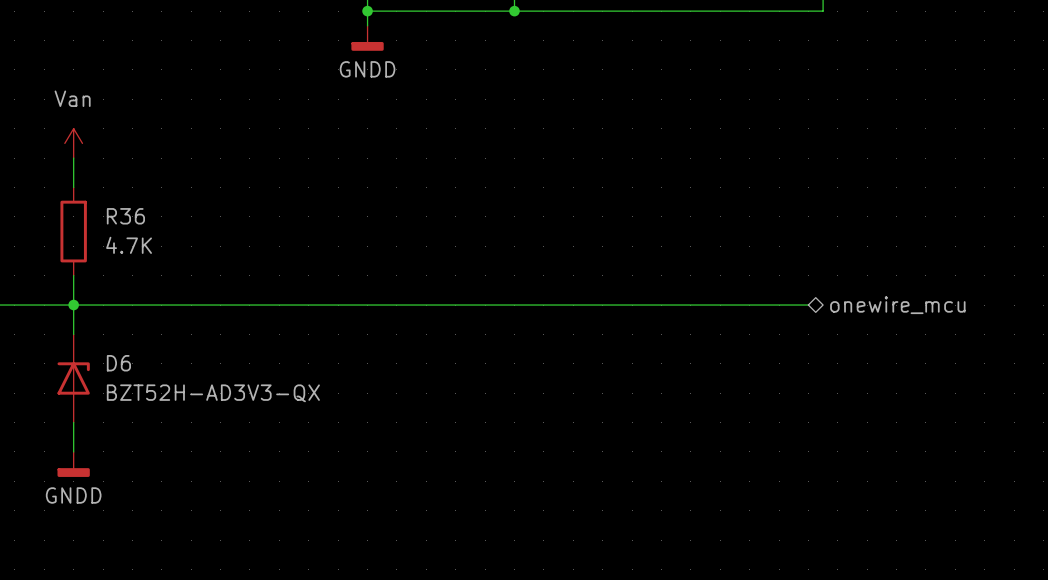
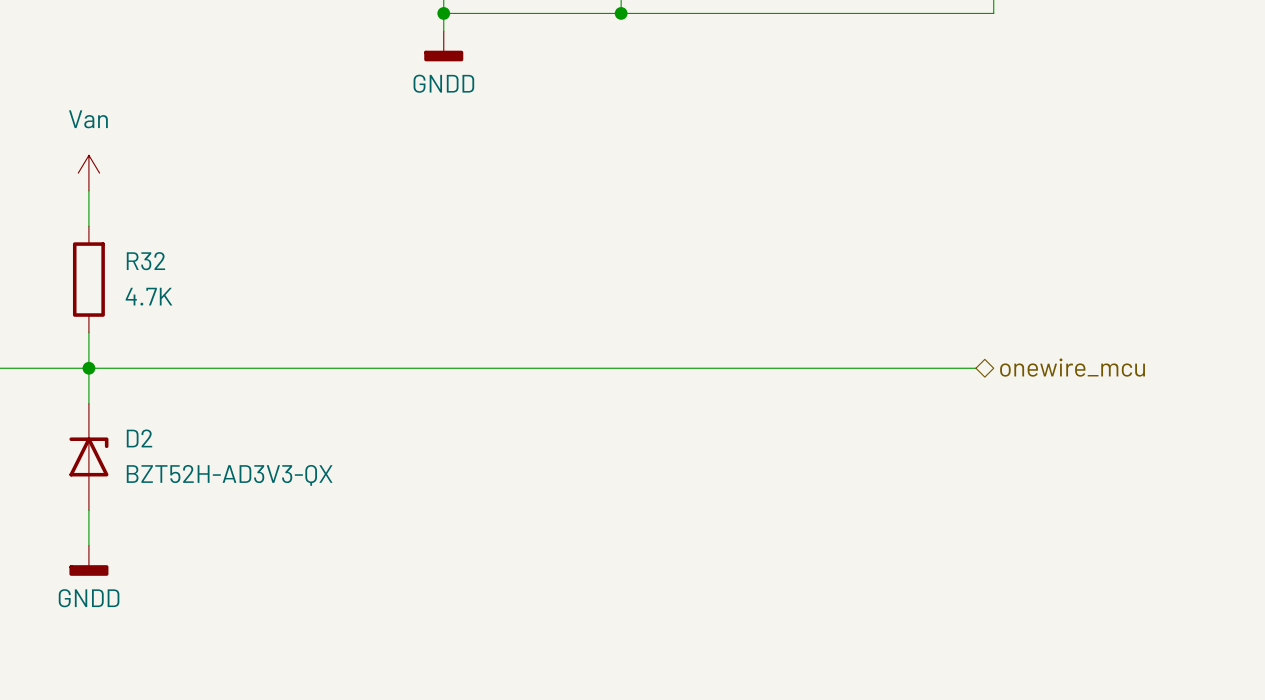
R36 name: R36 (125, 216) -> R32 (145, 261)
D6 name: D6 (118, 363) -> D2 (139, 438)

